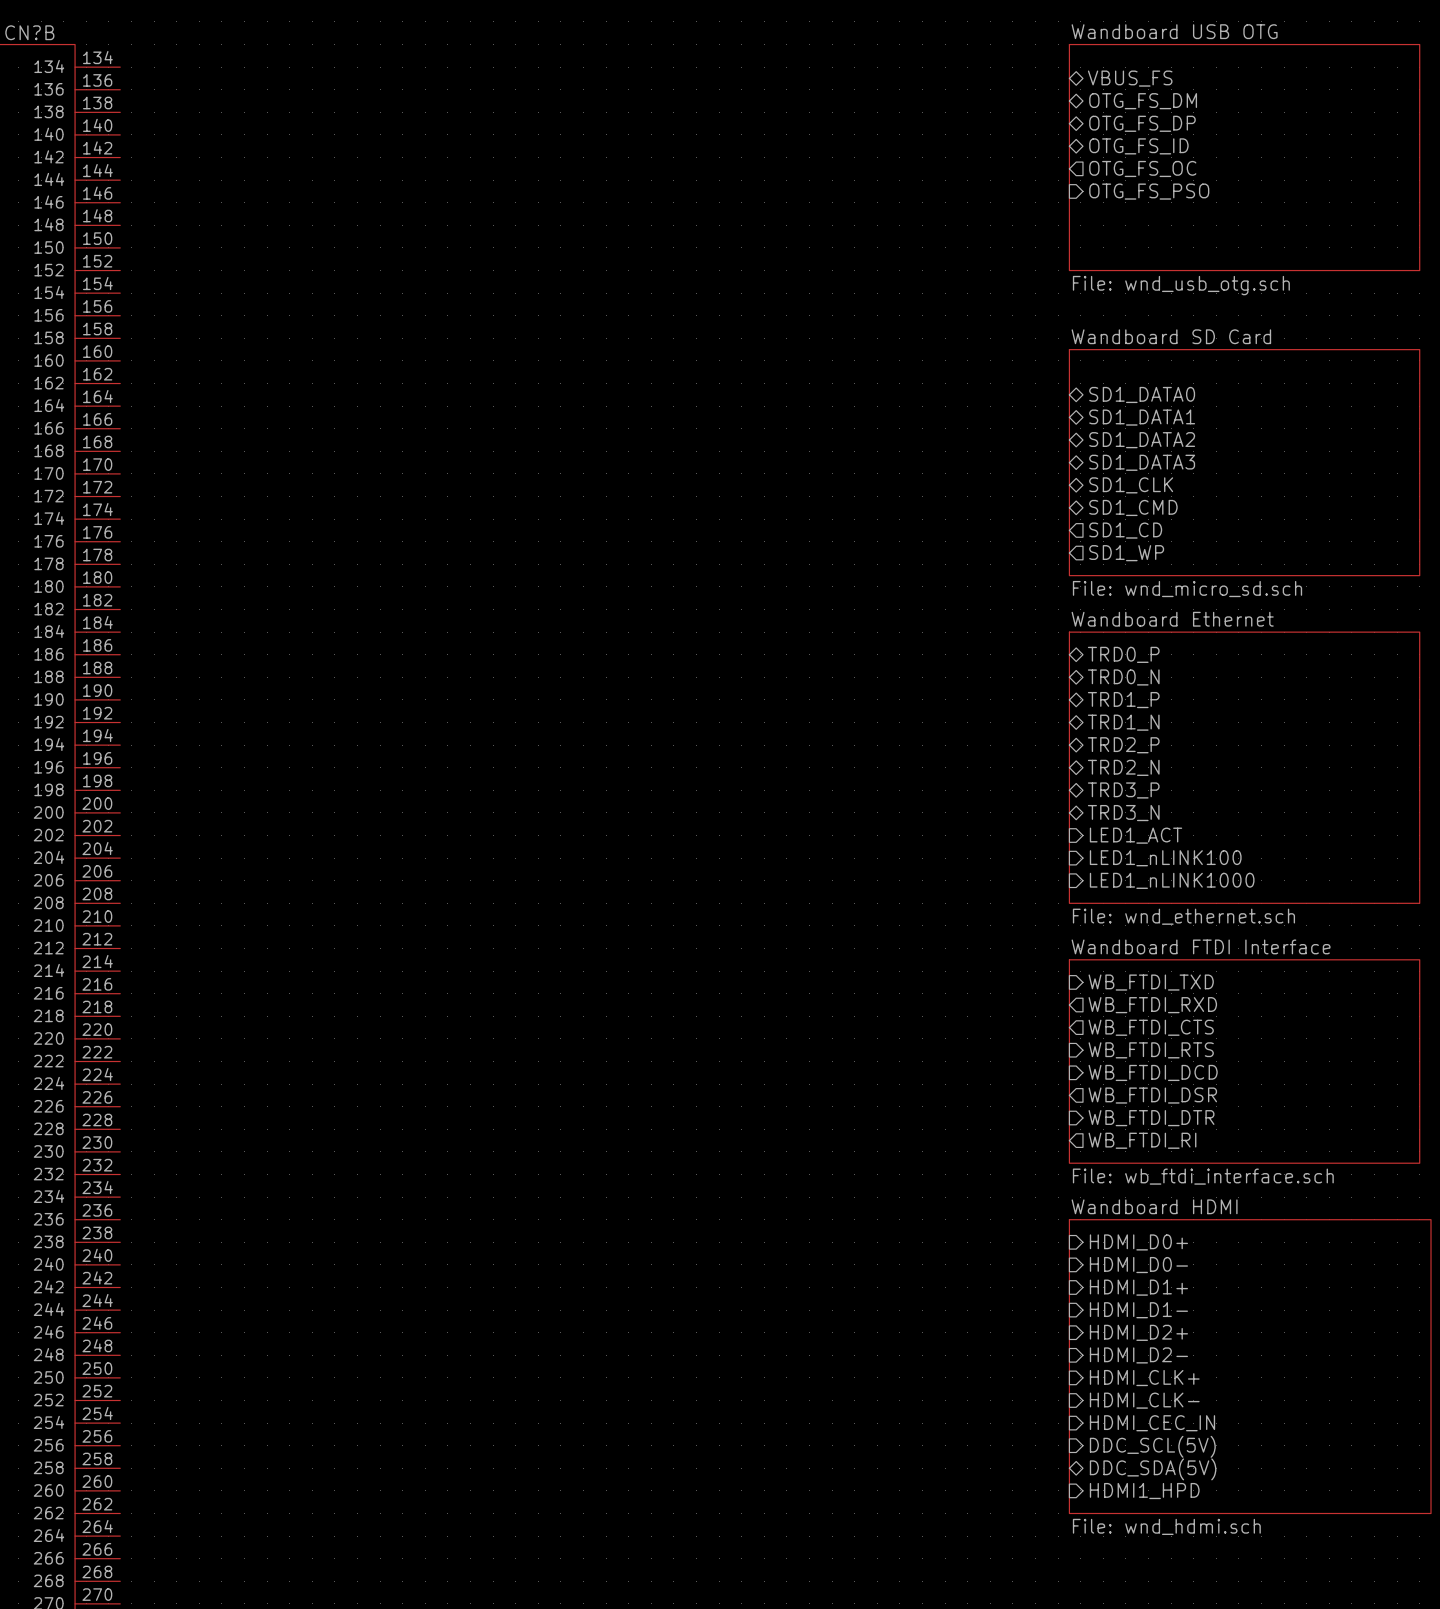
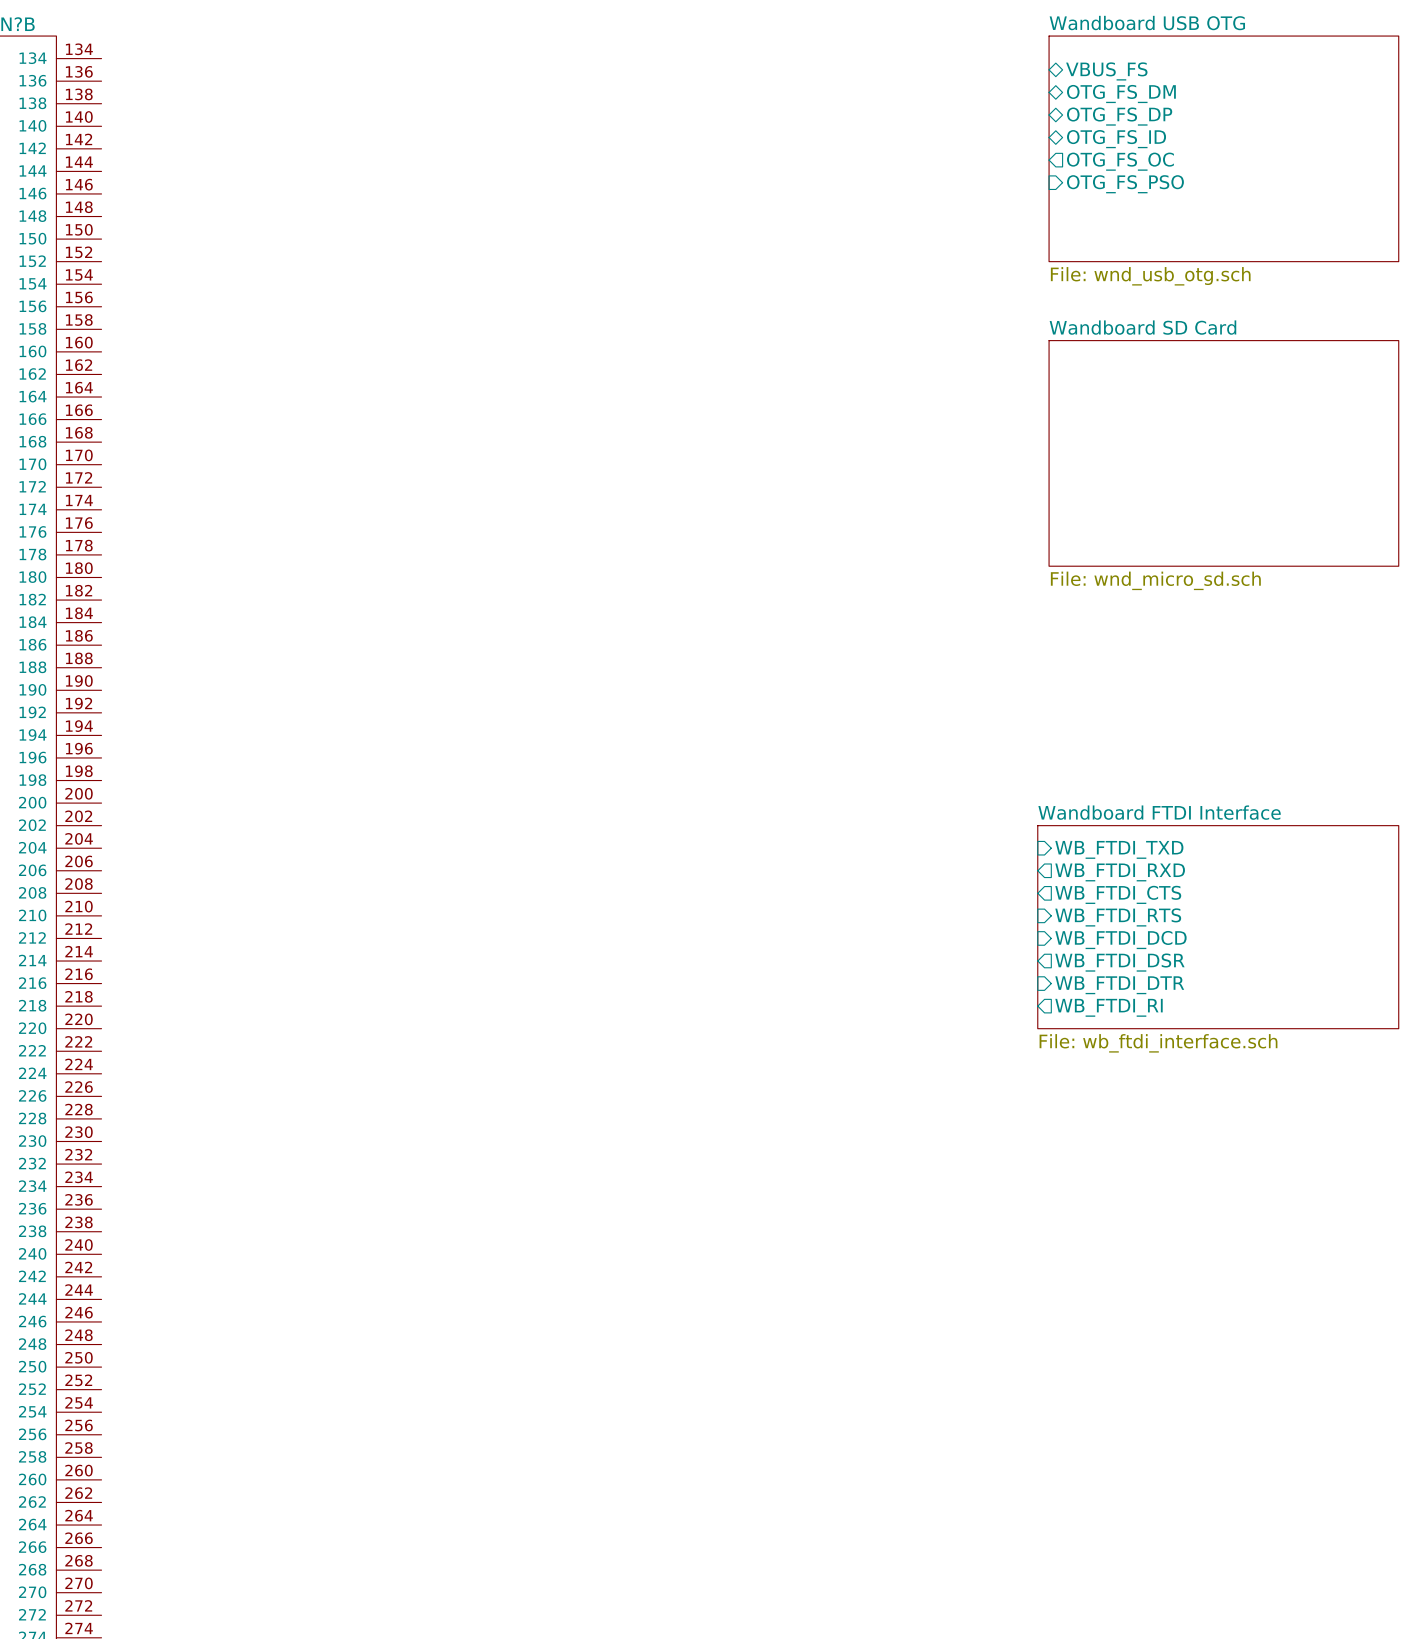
sheet pin: SD1_DATA0 (1142, 394) -> none
sheet pin: SD1_DATA1 (1142, 417) -> none
sheet pin: SD1_DATA2 (1142, 440) -> none
sheet pin: SD1_DATA3 (1142, 462) -> none
sheet pin: SD1_CLK (1131, 485) -> none
sheet pin: SD1_CMD (1133, 507) -> none
sheet pin: SD1_CD (1125, 530) -> none
sheet pin: SD1_WP (1126, 553) -> none
sheet pin: TRD0_P (1123, 654) -> none
sheet pin: TRD0_N (1123, 677) -> none
sheet pin: TRD1_P (1123, 700) -> none
sheet pin: TRD1_N (1123, 722) -> none
sheet pin: TRD2_P (1123, 745) -> none
sheet pin: TRD2_N (1123, 767) -> none
sheet Wandboard Ethernet: File: wnd_ethernet.sch (1244, 767) -> none
sheet pin: TRD3_P (1123, 790) -> none
sheet pin: TRD3_N (1123, 813) -> none
sheet pin: LED1_ACT (1136, 835) -> none
sheet pin: LED1_nLINK100 (1165, 858) -> none
sheet pin: LED1_nLINK1000 (1172, 880) -> none
sheet Wandboard FTDI Interface: none -> File: wb_ftdi_interface.sch (1218, 927)
sheet pin position: WB_FTDI_TXD (1151, 982) -> WB_FTDI_TXD (1119, 849)
sheet pin position: WB_FTDI_RXD (1152, 1005) -> WB_FTDI_RXD (1120, 872)
sheet pin position: WB_FTDI_CTS (1151, 1027) -> WB_FTDI_CTS (1118, 894)
sheet pin position: WB_FTDI_RTS (1151, 1050) -> WB_FTDI_RTS (1118, 917)
sheet Wandboard FTDI Interface: File: wb_ftdi_interface.sch (1244, 1061) -> none
sheet pin position: WB_FTDI_DCD (1153, 1072) -> WB_FTDI_DCD (1120, 940)
sheet pin position: WB_FTDI_DSR (1152, 1095) -> WB_FTDI_DSR (1119, 962)
sheet pin position: WB_FTDI_DTR (1151, 1118) -> WB_FTDI_DTR (1119, 985)
sheet pin position: WB_FTDI_RI (1142, 1140) -> WB_FTDI_RI (1109, 1007)
sheet pin: HDMI_D0+ (1138, 1242) -> none
sheet pin: HDMI_D0- (1138, 1265) -> none
sheet pin: HDMI_D1+ (1138, 1287) -> none
sheet pin: HDMI_D1- (1138, 1310) -> none
sheet pin: HDMI_D2+ (1138, 1332) -> none
sheet pin: HDMI_D2- (1138, 1355) -> none
sheet Wandboard HDMI: File: wnd_hdmi.sch (1250, 1366) -> none
sheet pin: HDMI_CLK+ (1144, 1378) -> none
sheet pin: HDMI_CLK- (1144, 1400) -> none
sheet pin: HDMI_CEC_IN (1152, 1423) -> none
sheet pin: DDC_SCL(5V) (1152, 1446) -> none
sheet pin: DDC_SDA(5V) (1153, 1469) -> none
sheet pin: HDMI1_HPD (1144, 1491) -> none

